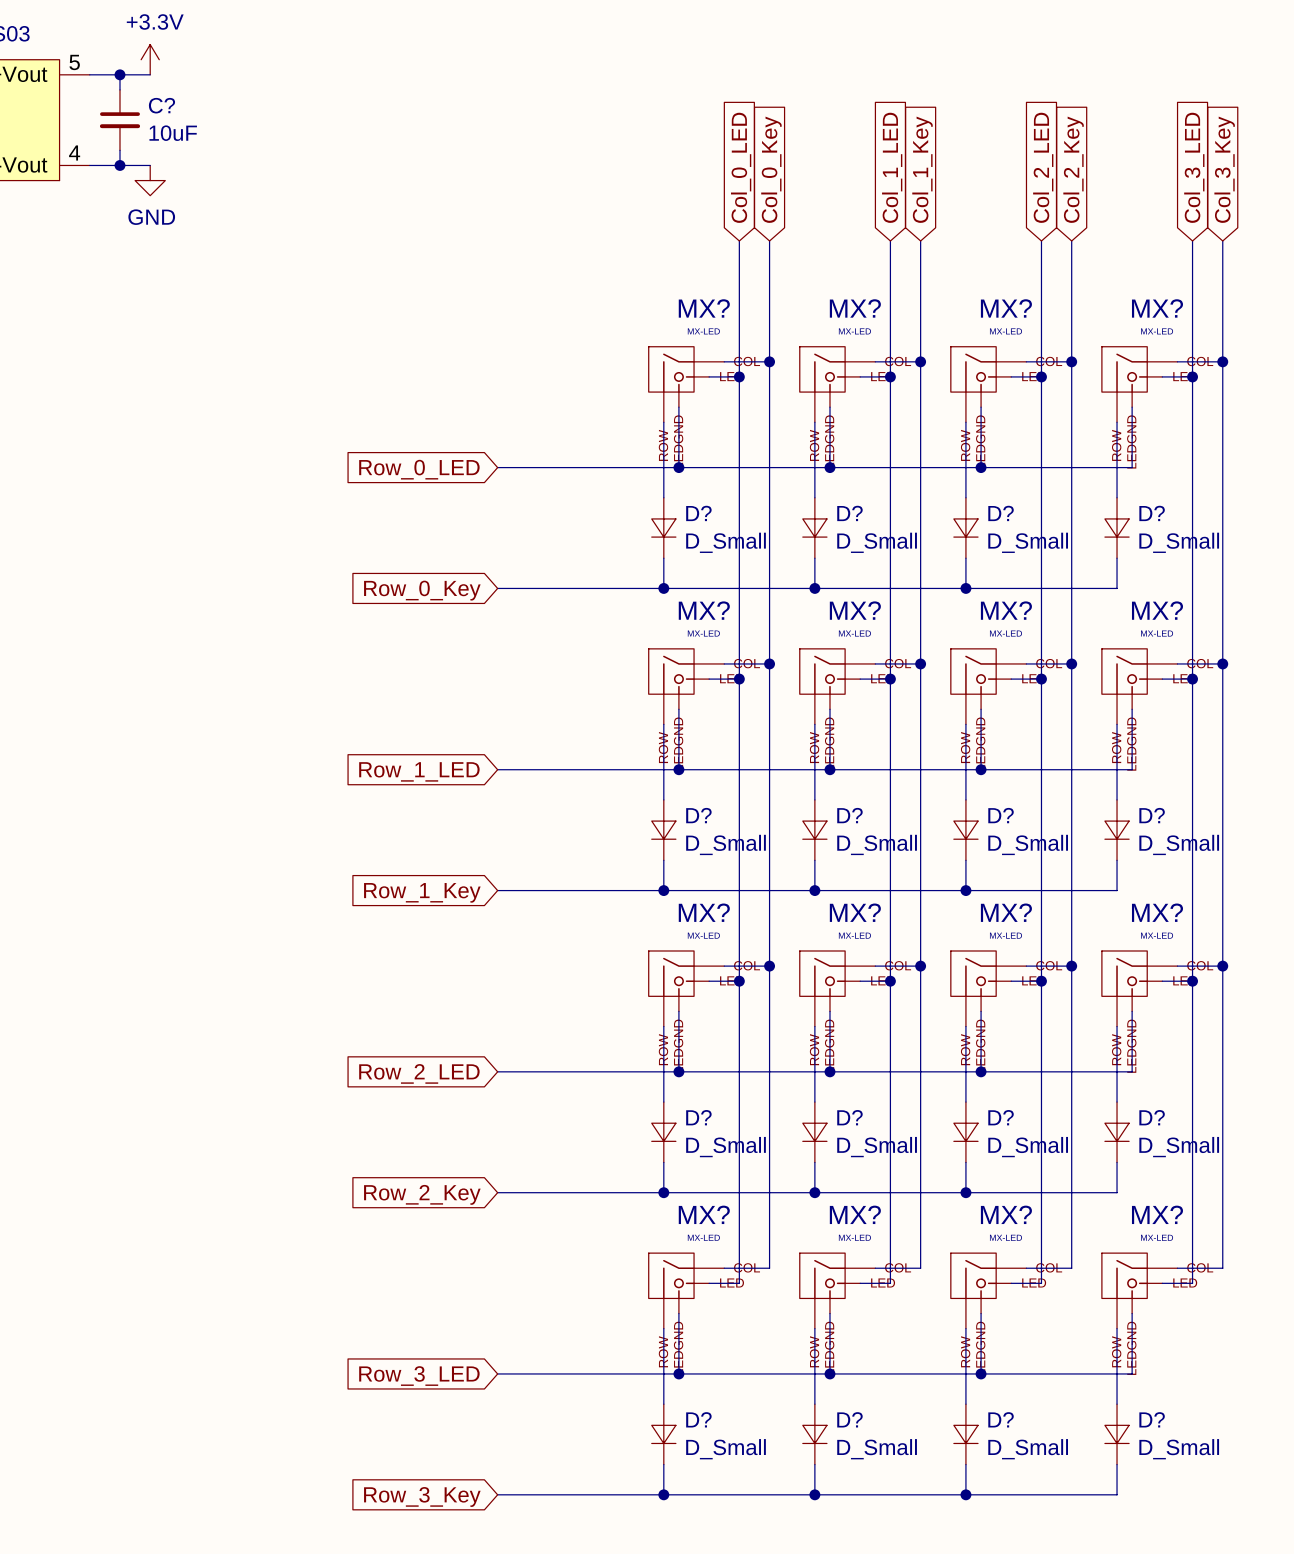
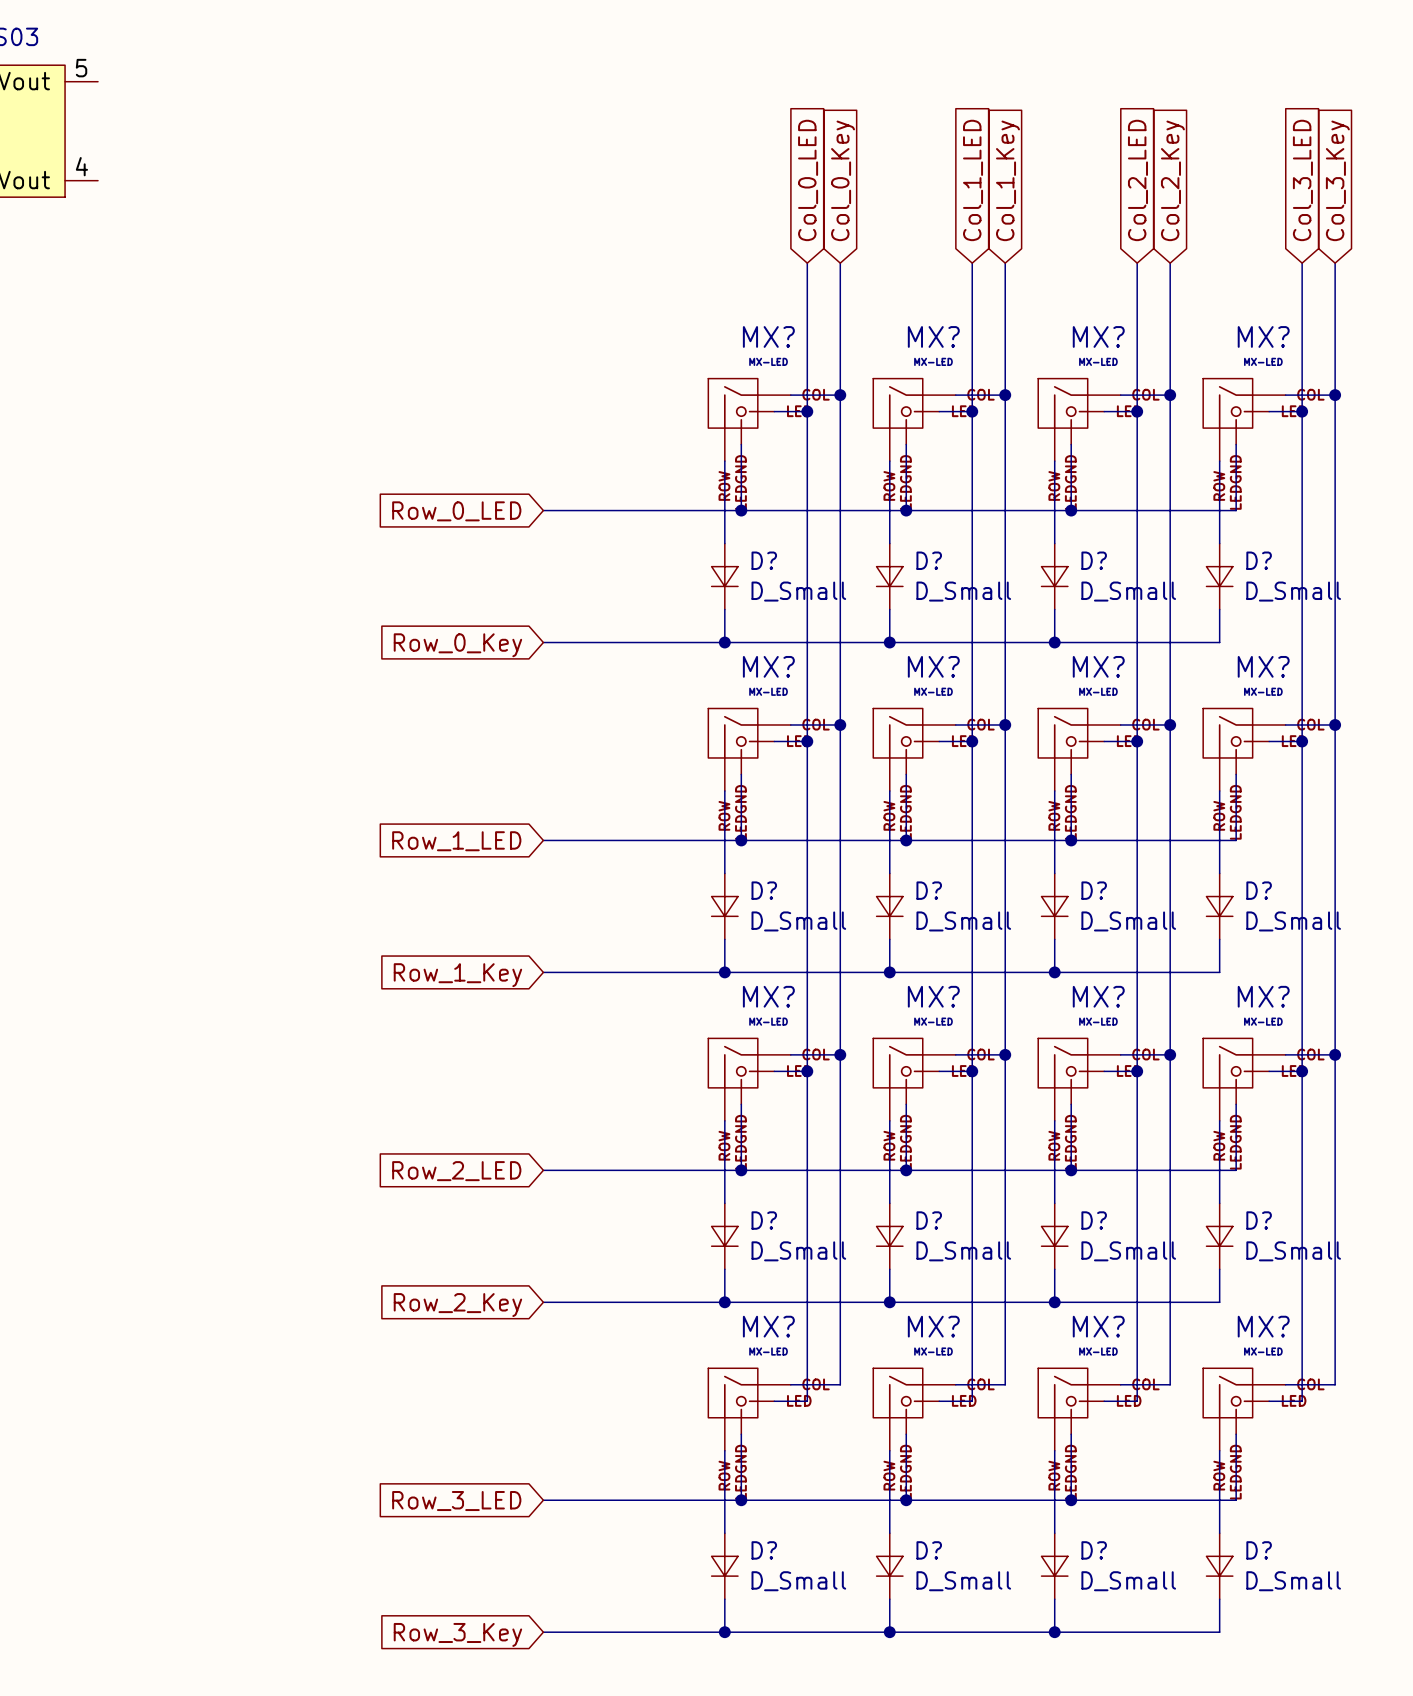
power symbol: +3.3V (150, 59) -> none
wire: (89, 74) (150, 74) -> none
wire: (119, 74) (119, 89) -> none
junction: (119, 74) -> none
C?: 10uF (119, 120) -> none
wire: (119, 150) (119, 165) -> none
wire: (89, 165) (150, 165) -> none
junction: (119, 165) -> none
power symbol: GND (150, 180) -> none

